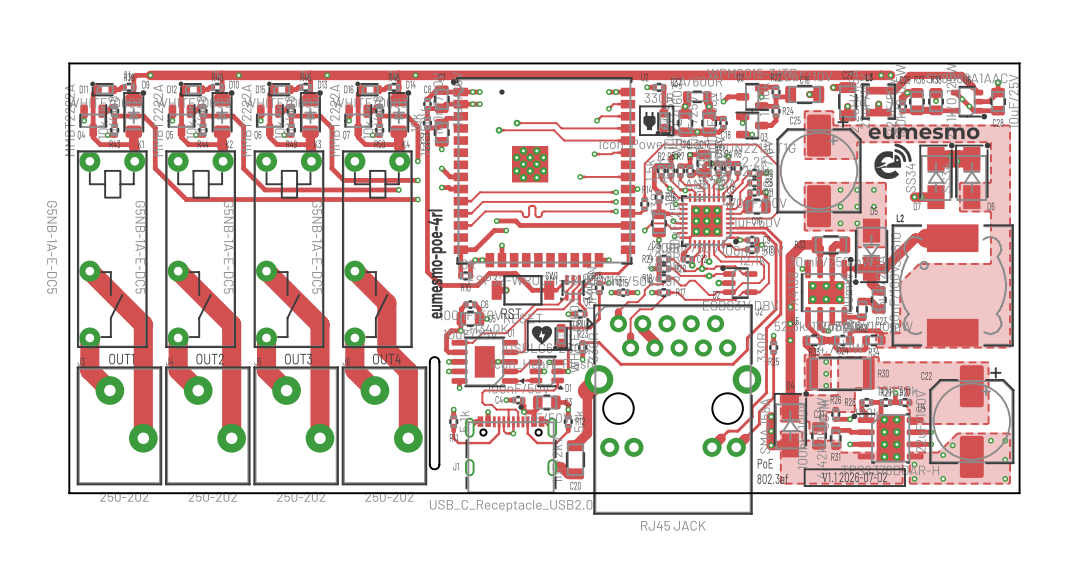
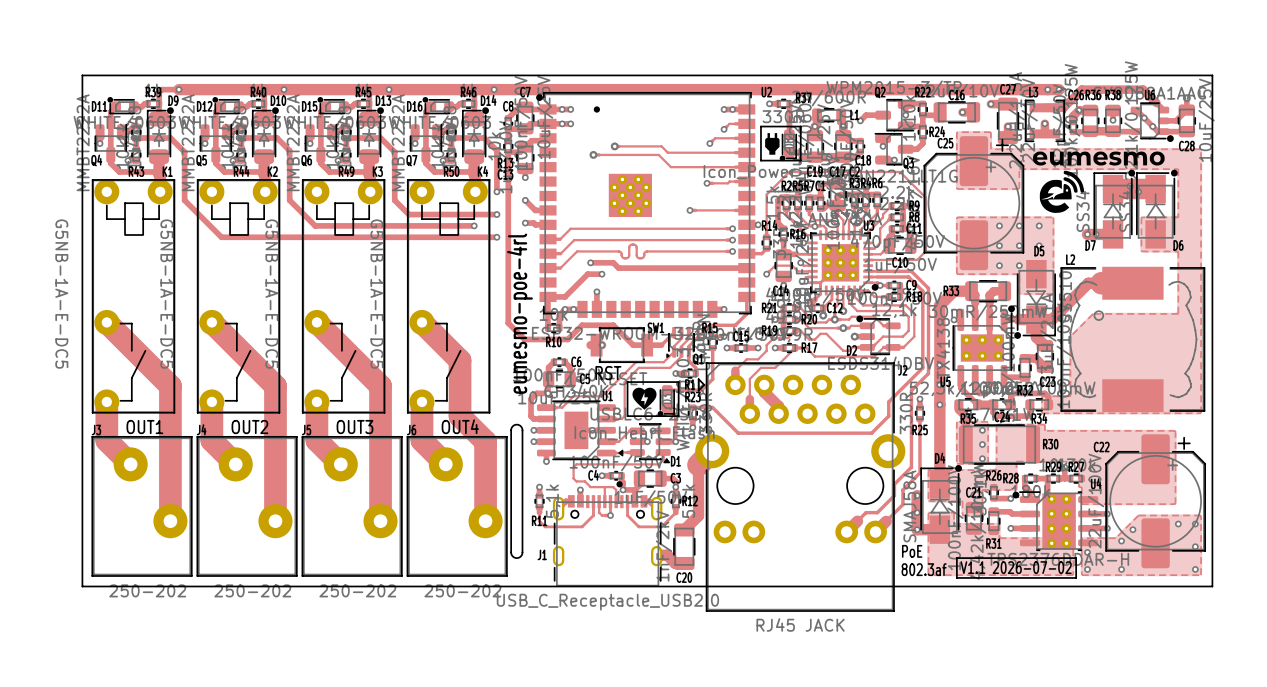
SW1 footprint: [491, 275, 555, 306] -> [590, 327, 654, 363]

